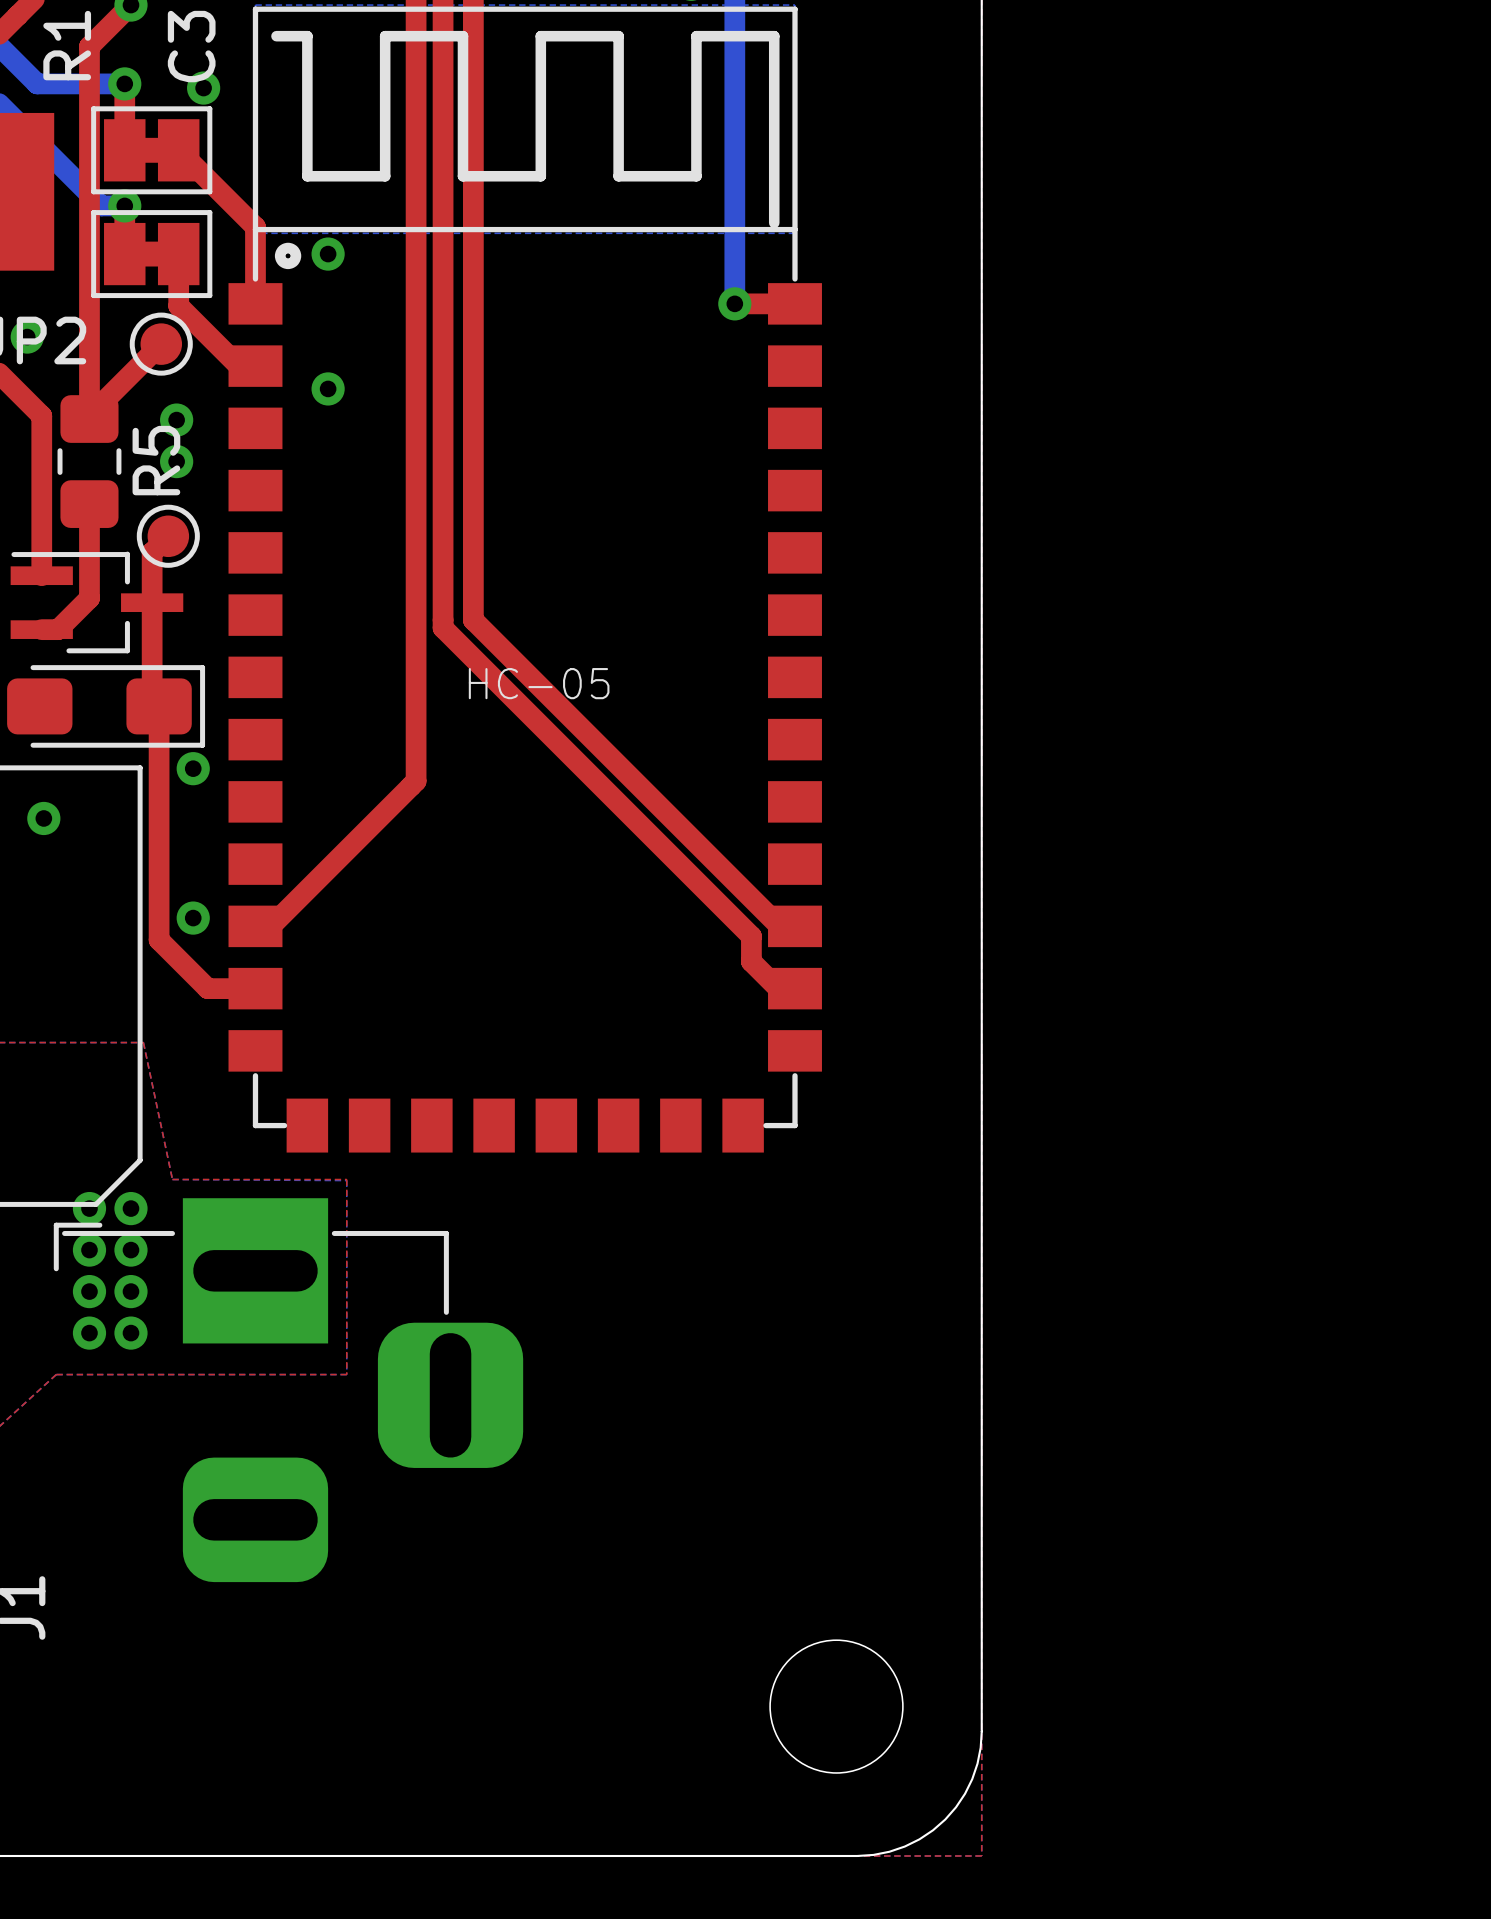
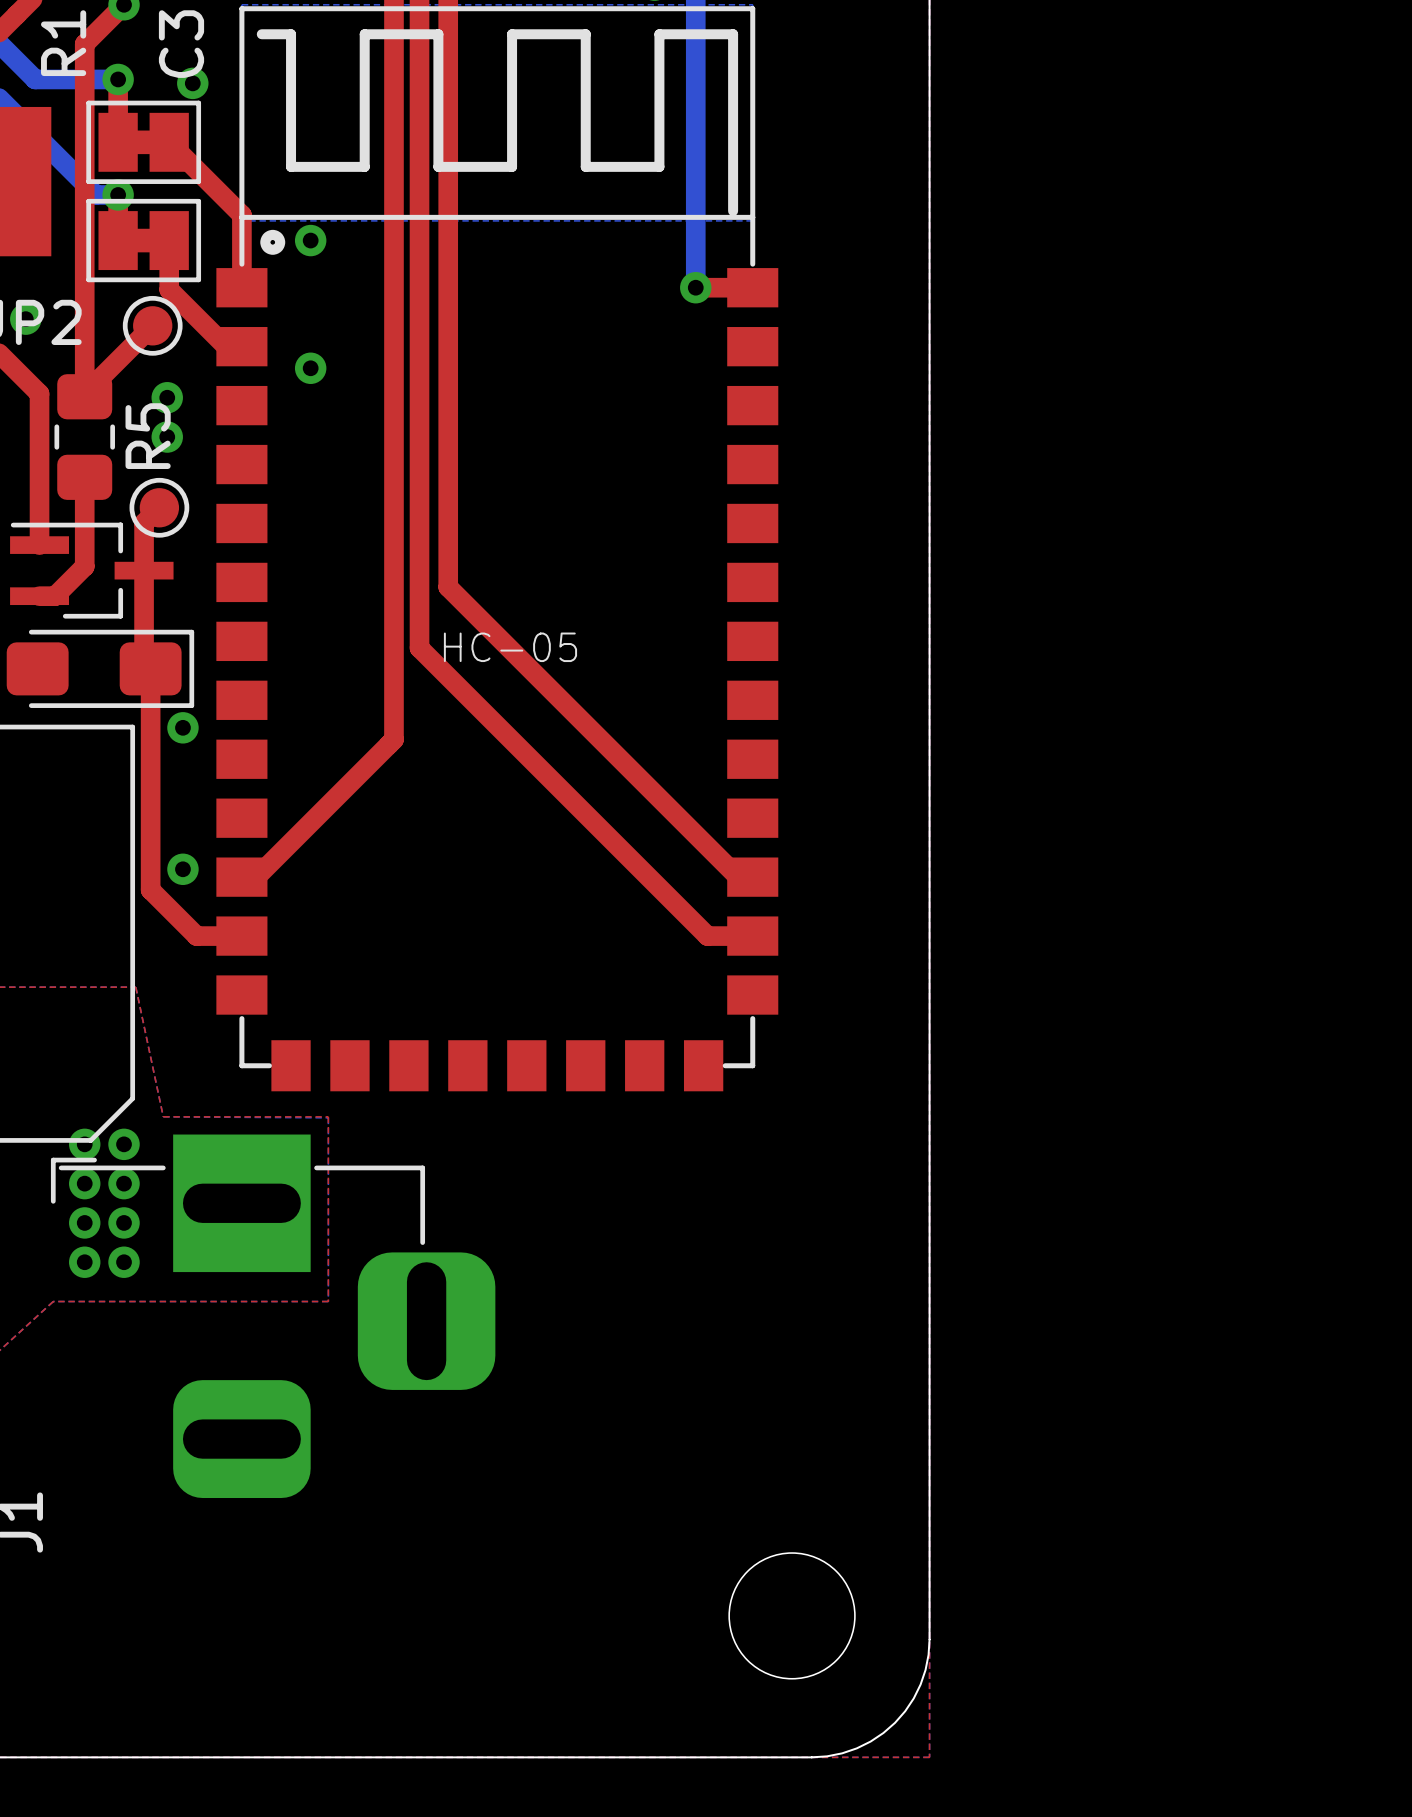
top track: (443, 627) (751, 936) (751, 961) (778, 988) -> (419, 594) (419, 648) (707, 936) (737, 936)
via: (43, 818) -> none

